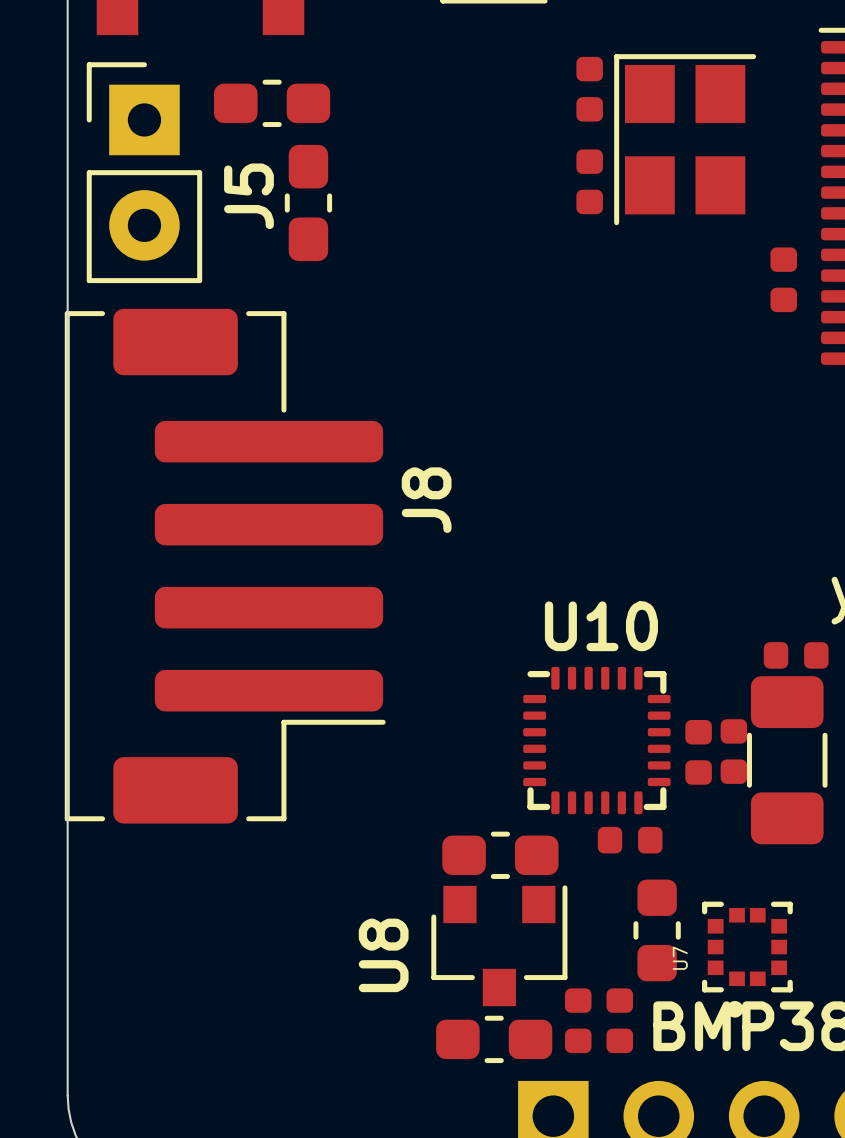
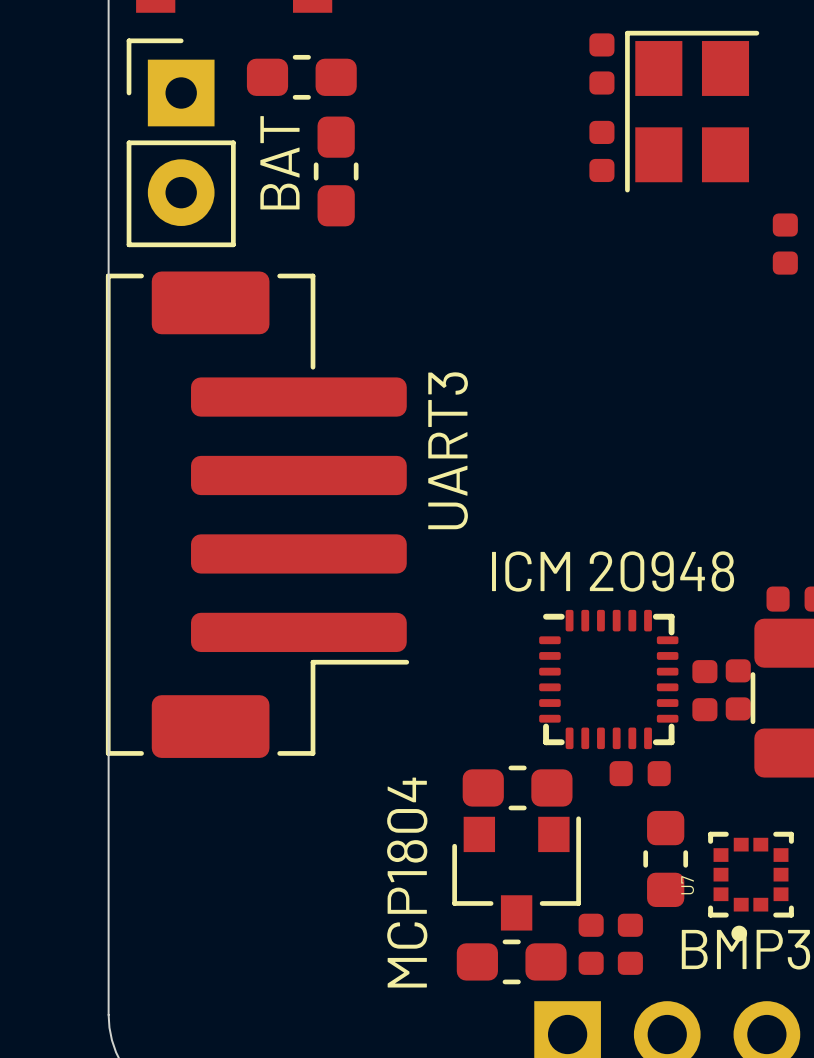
J5 name: J5 (248, 196) -> BAT (279, 162)
J8 name: J8 (426, 500) -> UART3 (448, 450)
U10 name: U10 (601, 626) -> ICM 20948 (613, 571)
U8 name: U8 (383, 955) -> MCP1804 (407, 882)

